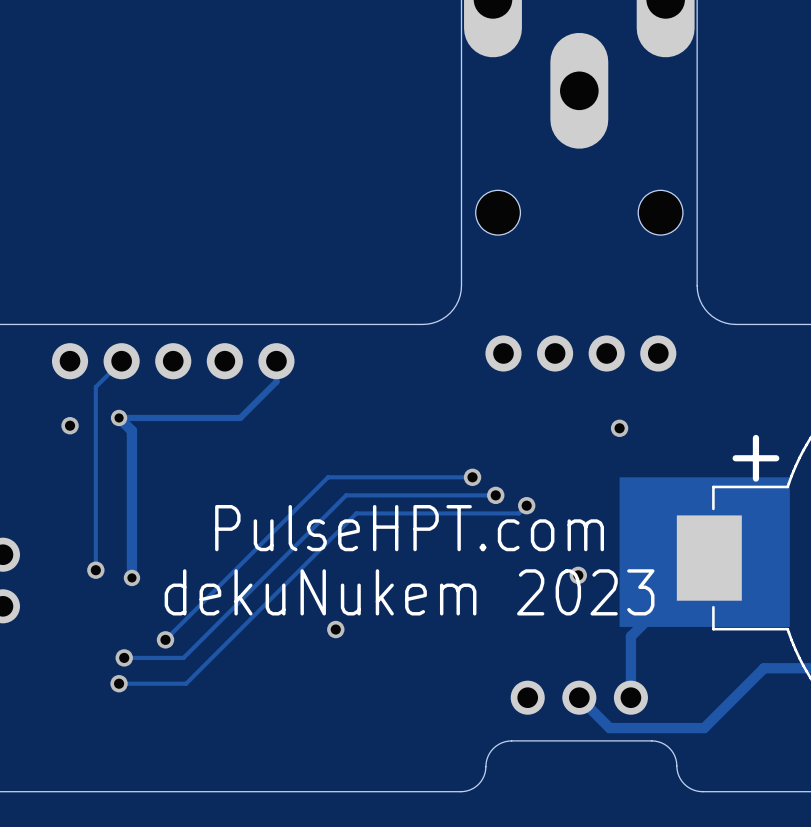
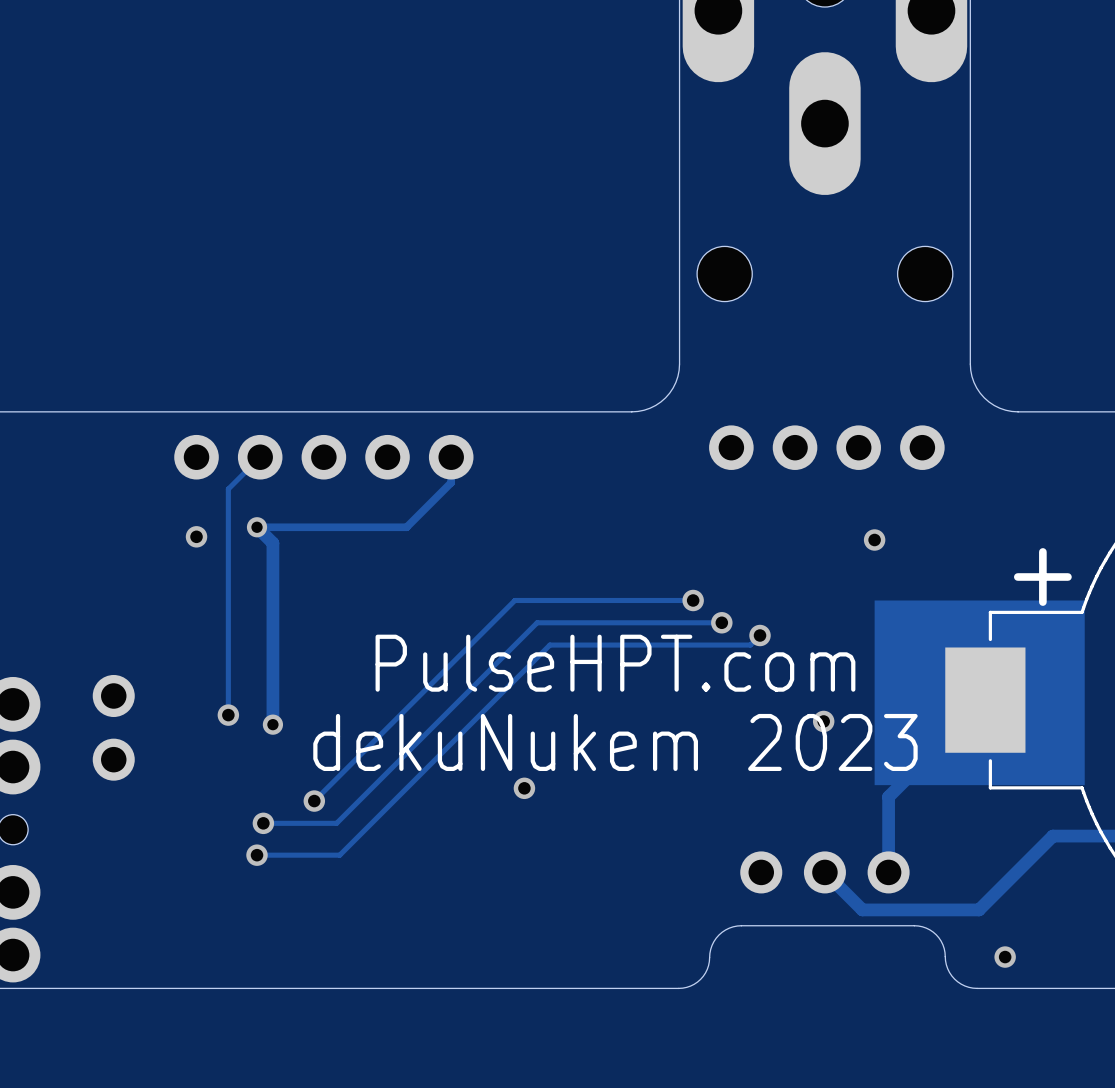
via: none -> (1005, 957)

